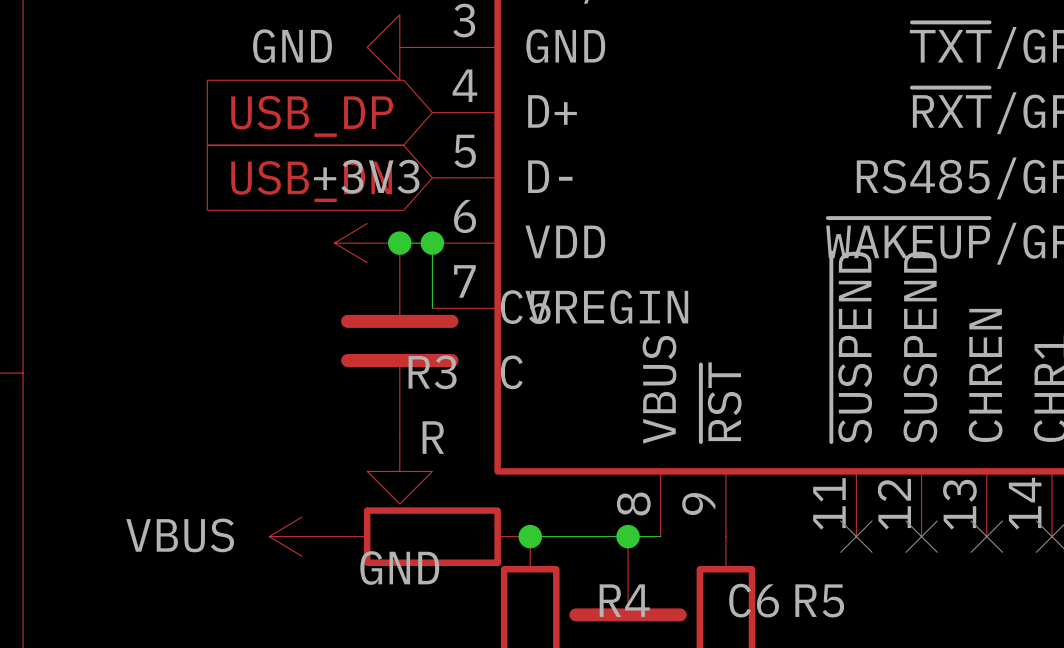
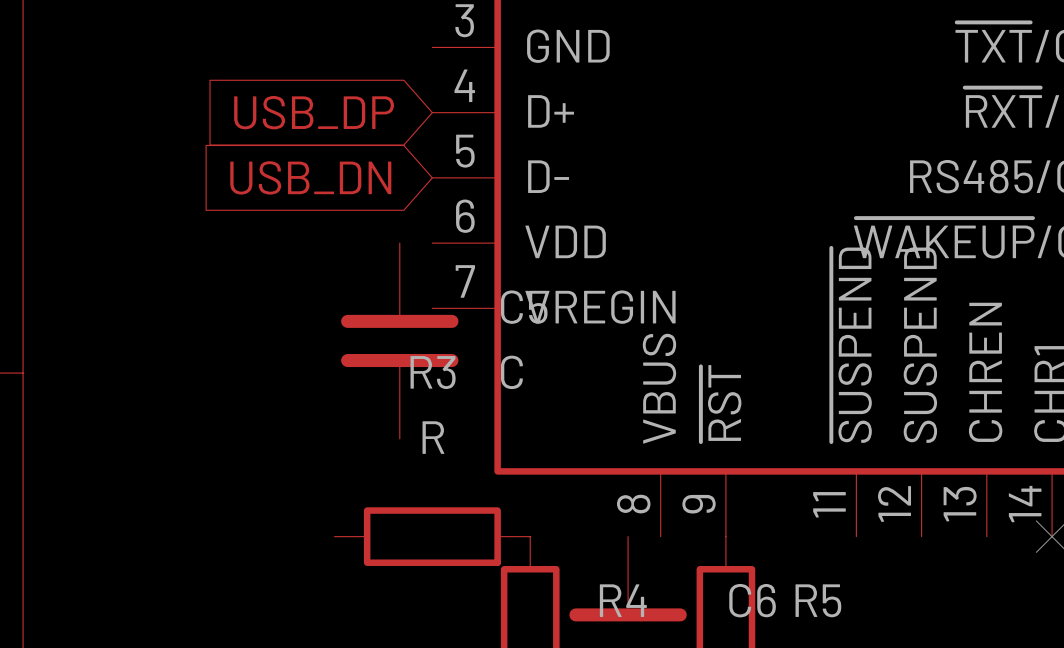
power symbol: GND (399, 47) -> none
power symbol: +3V3 (367, 243) -> none
wire: (399, 243) (432, 243) (432, 308) -> none
junction: (399, 243) -> none
junction: (432, 243) -> none
power symbol: GND (399, 471) -> none
power symbol: VBUS (301, 536) -> none
wire: (530, 536) (660, 536) -> none
junction: (530, 536) -> none
junction: (628, 536) -> none
no-connect mark: (856, 536) -> none
no-connect mark: (921, 536) -> none
no-connect mark: (986, 536) -> none

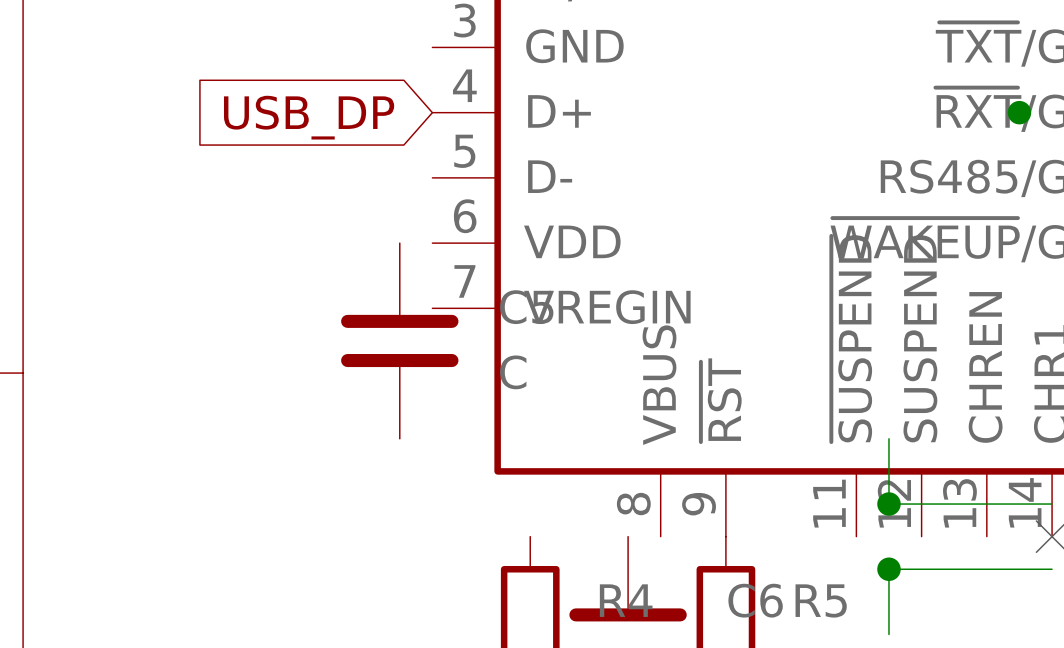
junction: none -> (1019, 112)
global label: USB_DN (310, 177) -> none
wire: none -> (888, 438) (888, 504) (1052, 504)
junction: none -> (888, 504)
R3: R (432, 536) -> none
junction: none -> (888, 569)
wire: none -> (1052, 569) (888, 569) (888, 634)

